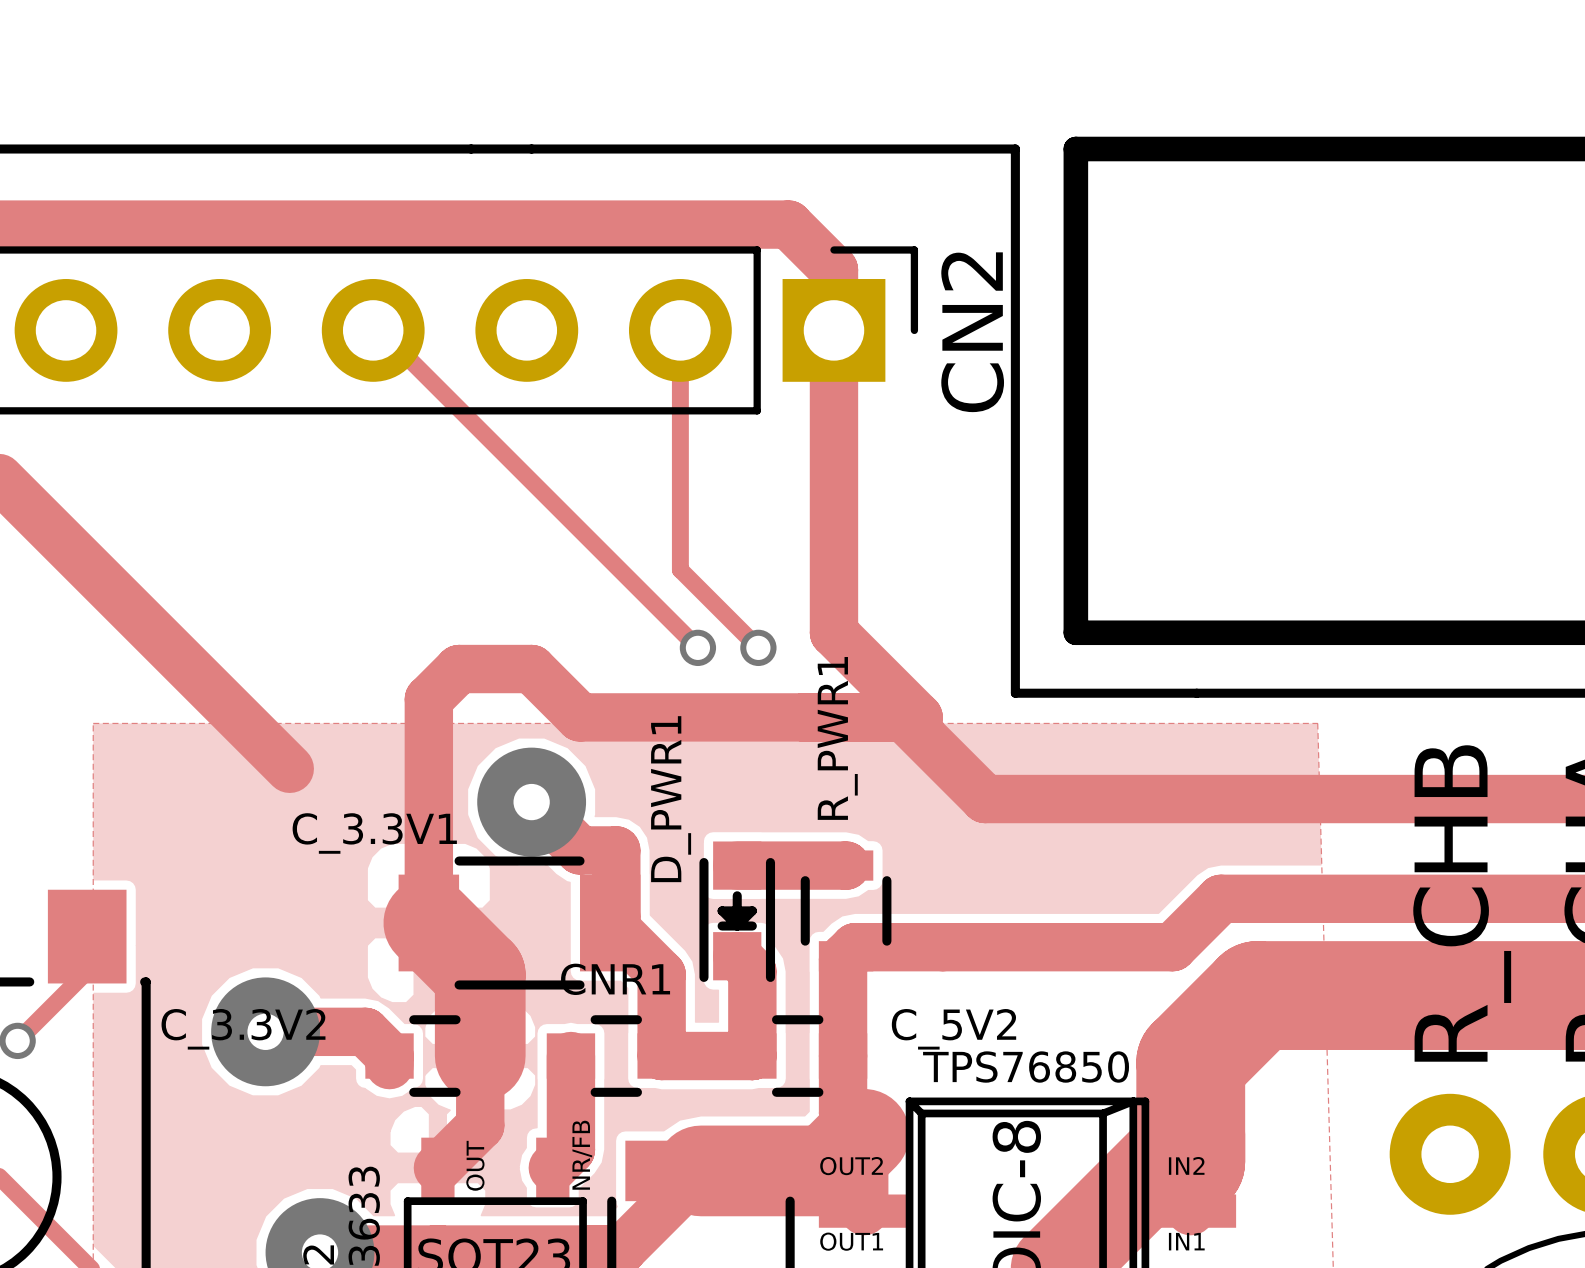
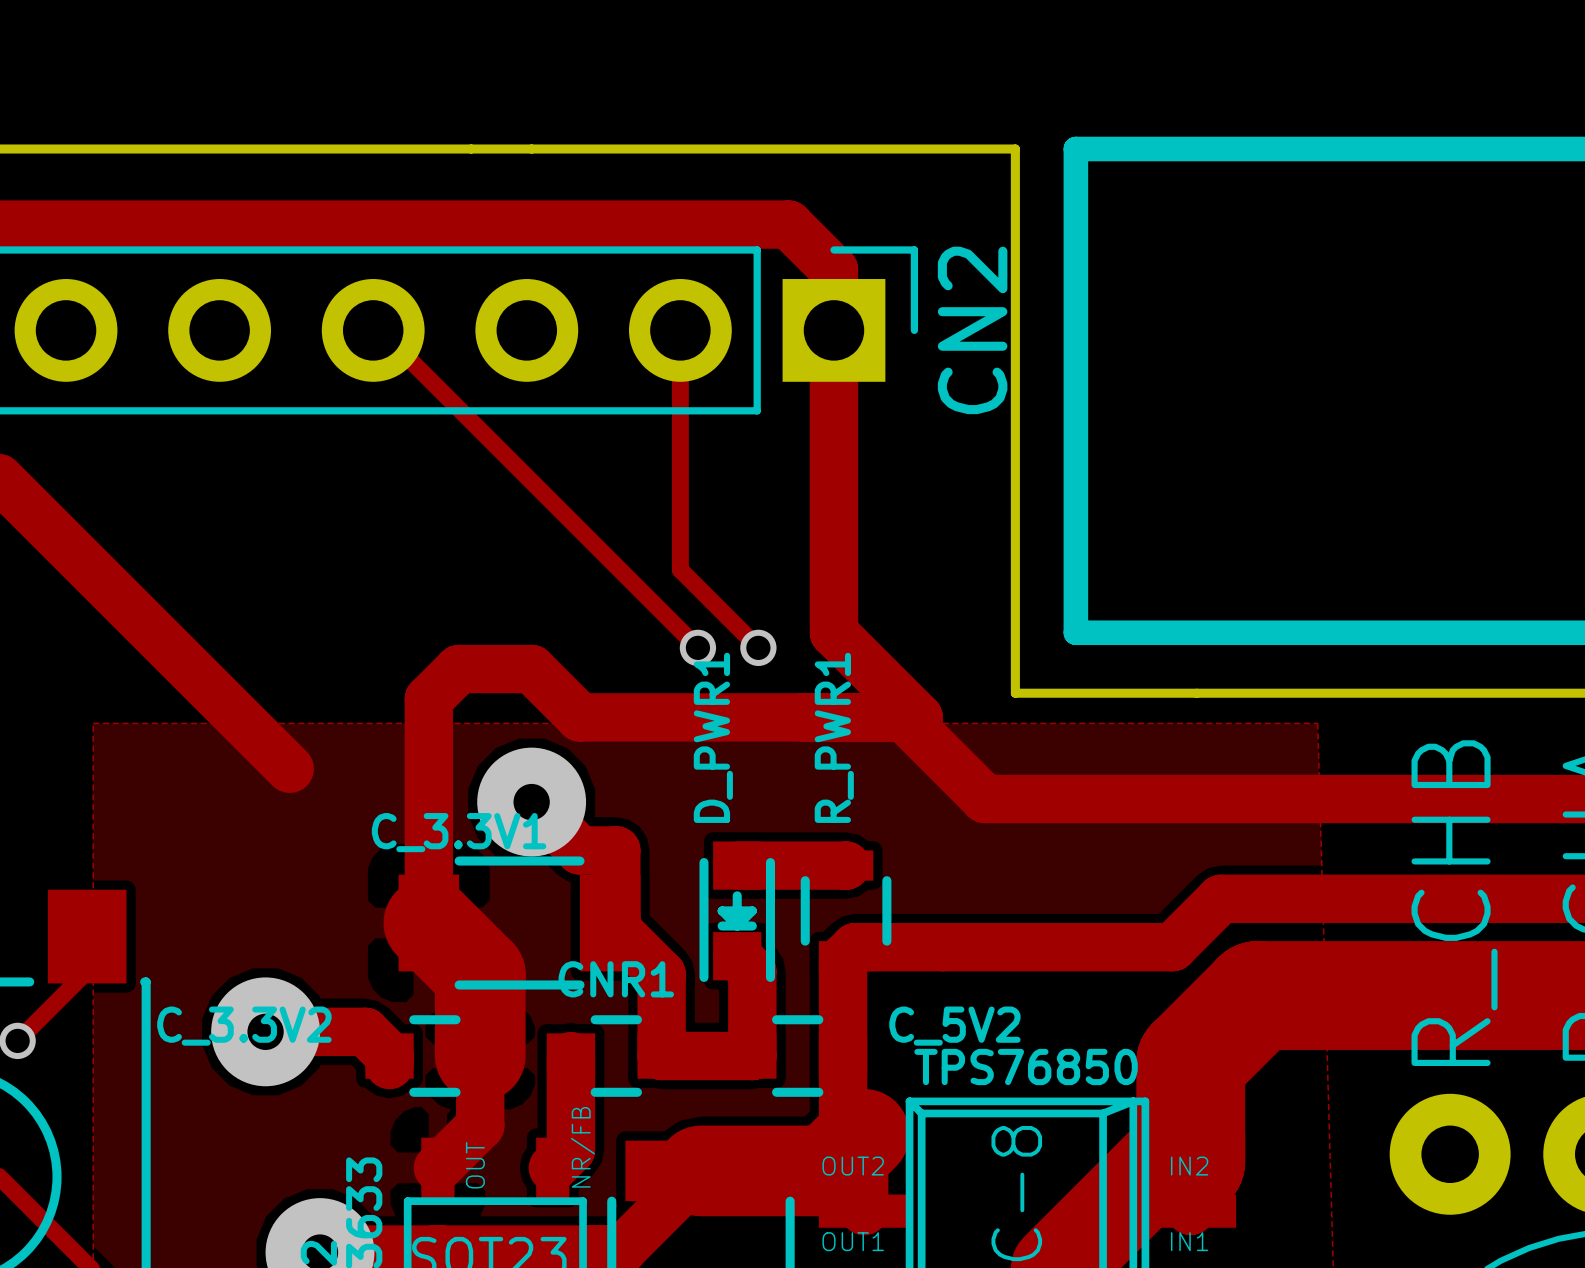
D_PWR1 name position: D_PWR1 (671, 799) -> D_PWR1 (713, 737)
C_3.3V1 name position: C_3.3V1 (374, 833) -> C_3.3V1 (459, 832)

